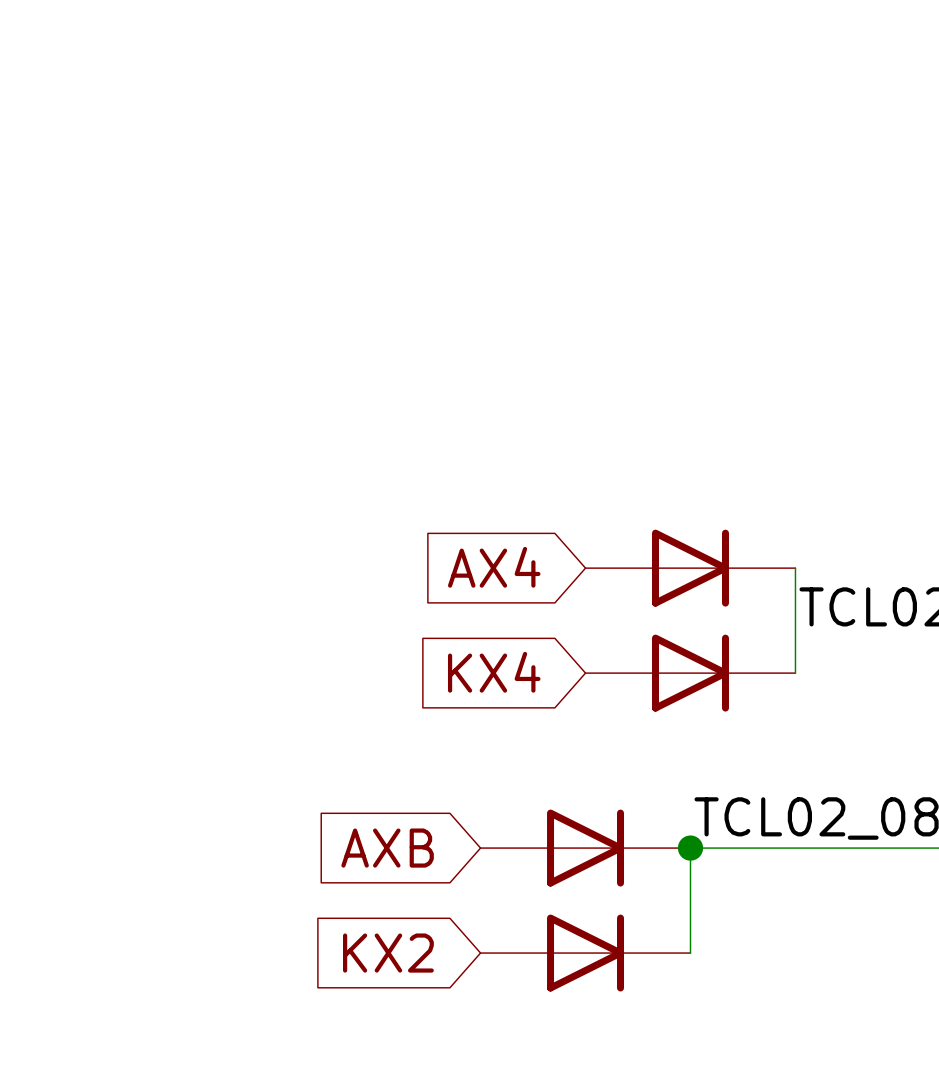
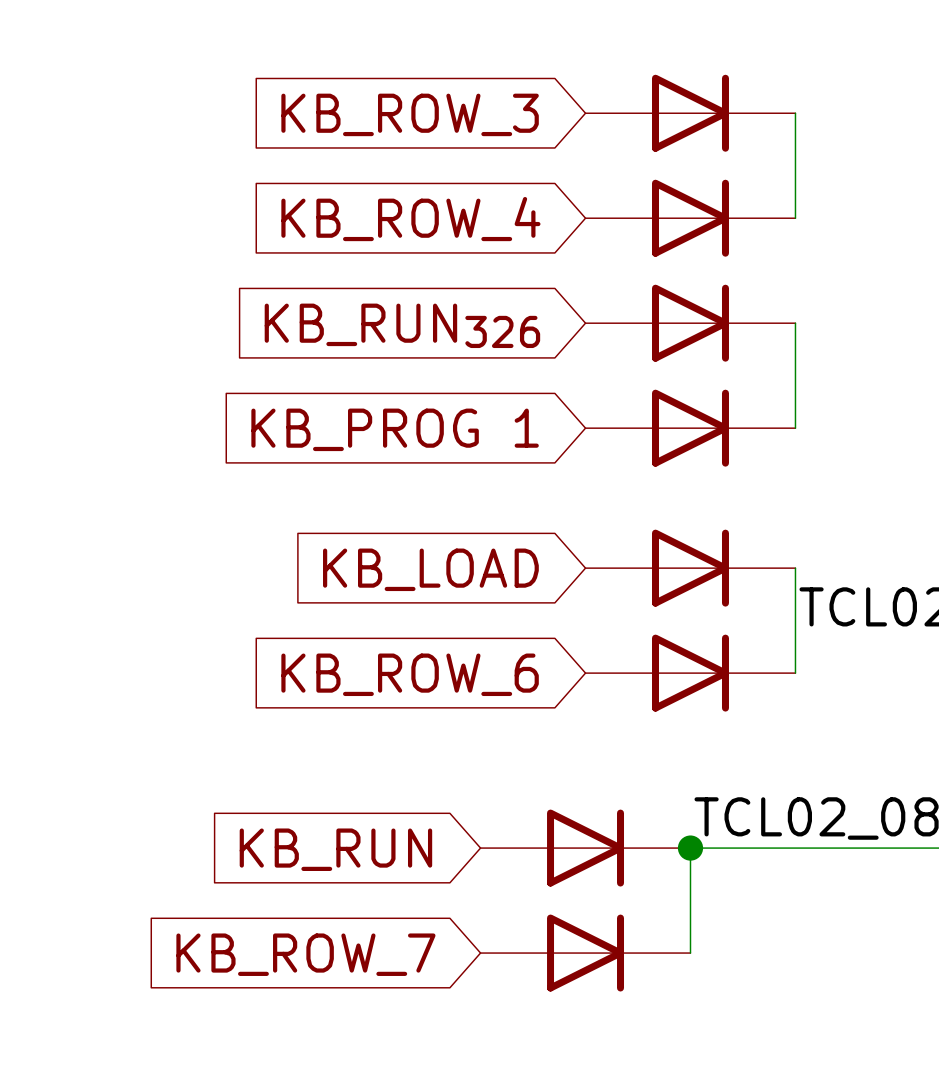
part: none -> (690, 113)
wire: none -> (795, 113) (795, 218)
global label: none -> KB_ROW_3 (410, 114)
part: none -> (690, 218)
global label: none -> KB_ROW_4 (410, 219)
part: none -> (690, 323)
wire: none -> (795, 323) (795, 428)
global label: none -> KB_RUN326 (402, 325)
part: none -> (690, 428)
global label: none -> KB_PROG 1 (395, 429)
global label: AX4 (494, 567) -> KB_LOAD (430, 569)
global label: KX4 (494, 672) -> KB_ROW_6 (410, 674)
global label: AXB (387, 848) -> KB_RUN (335, 849)
global label: KX2 (388, 953) -> KB_ROW_7 (305, 954)

